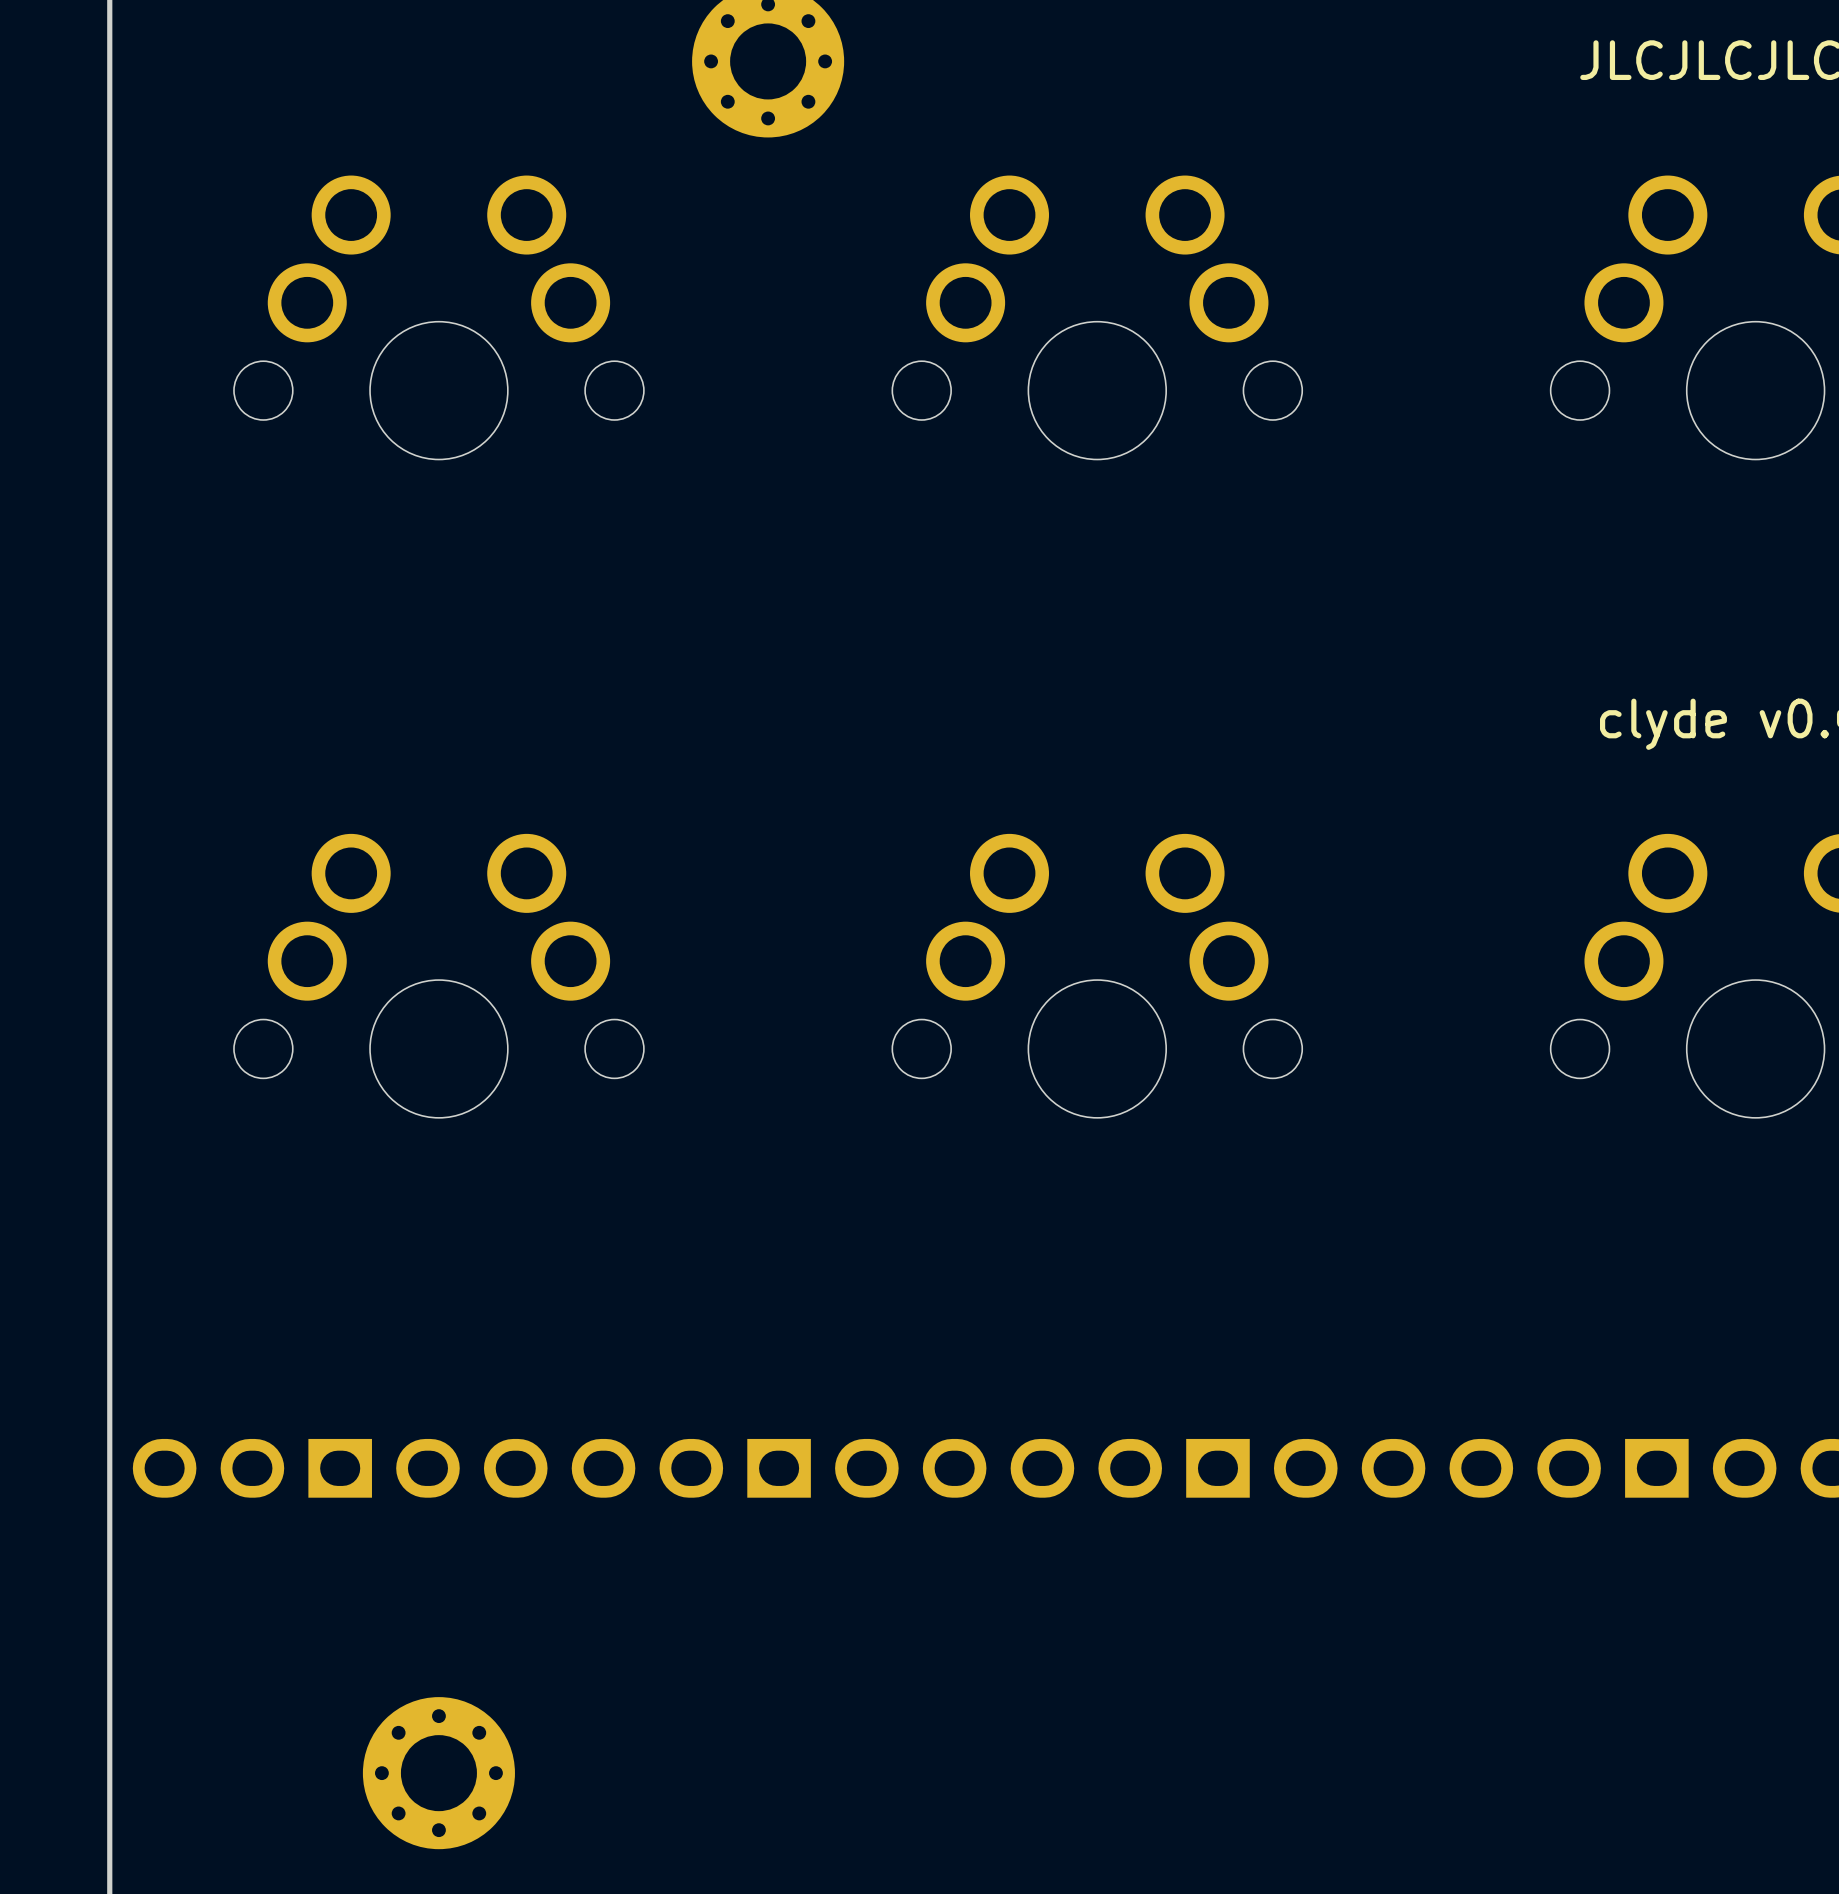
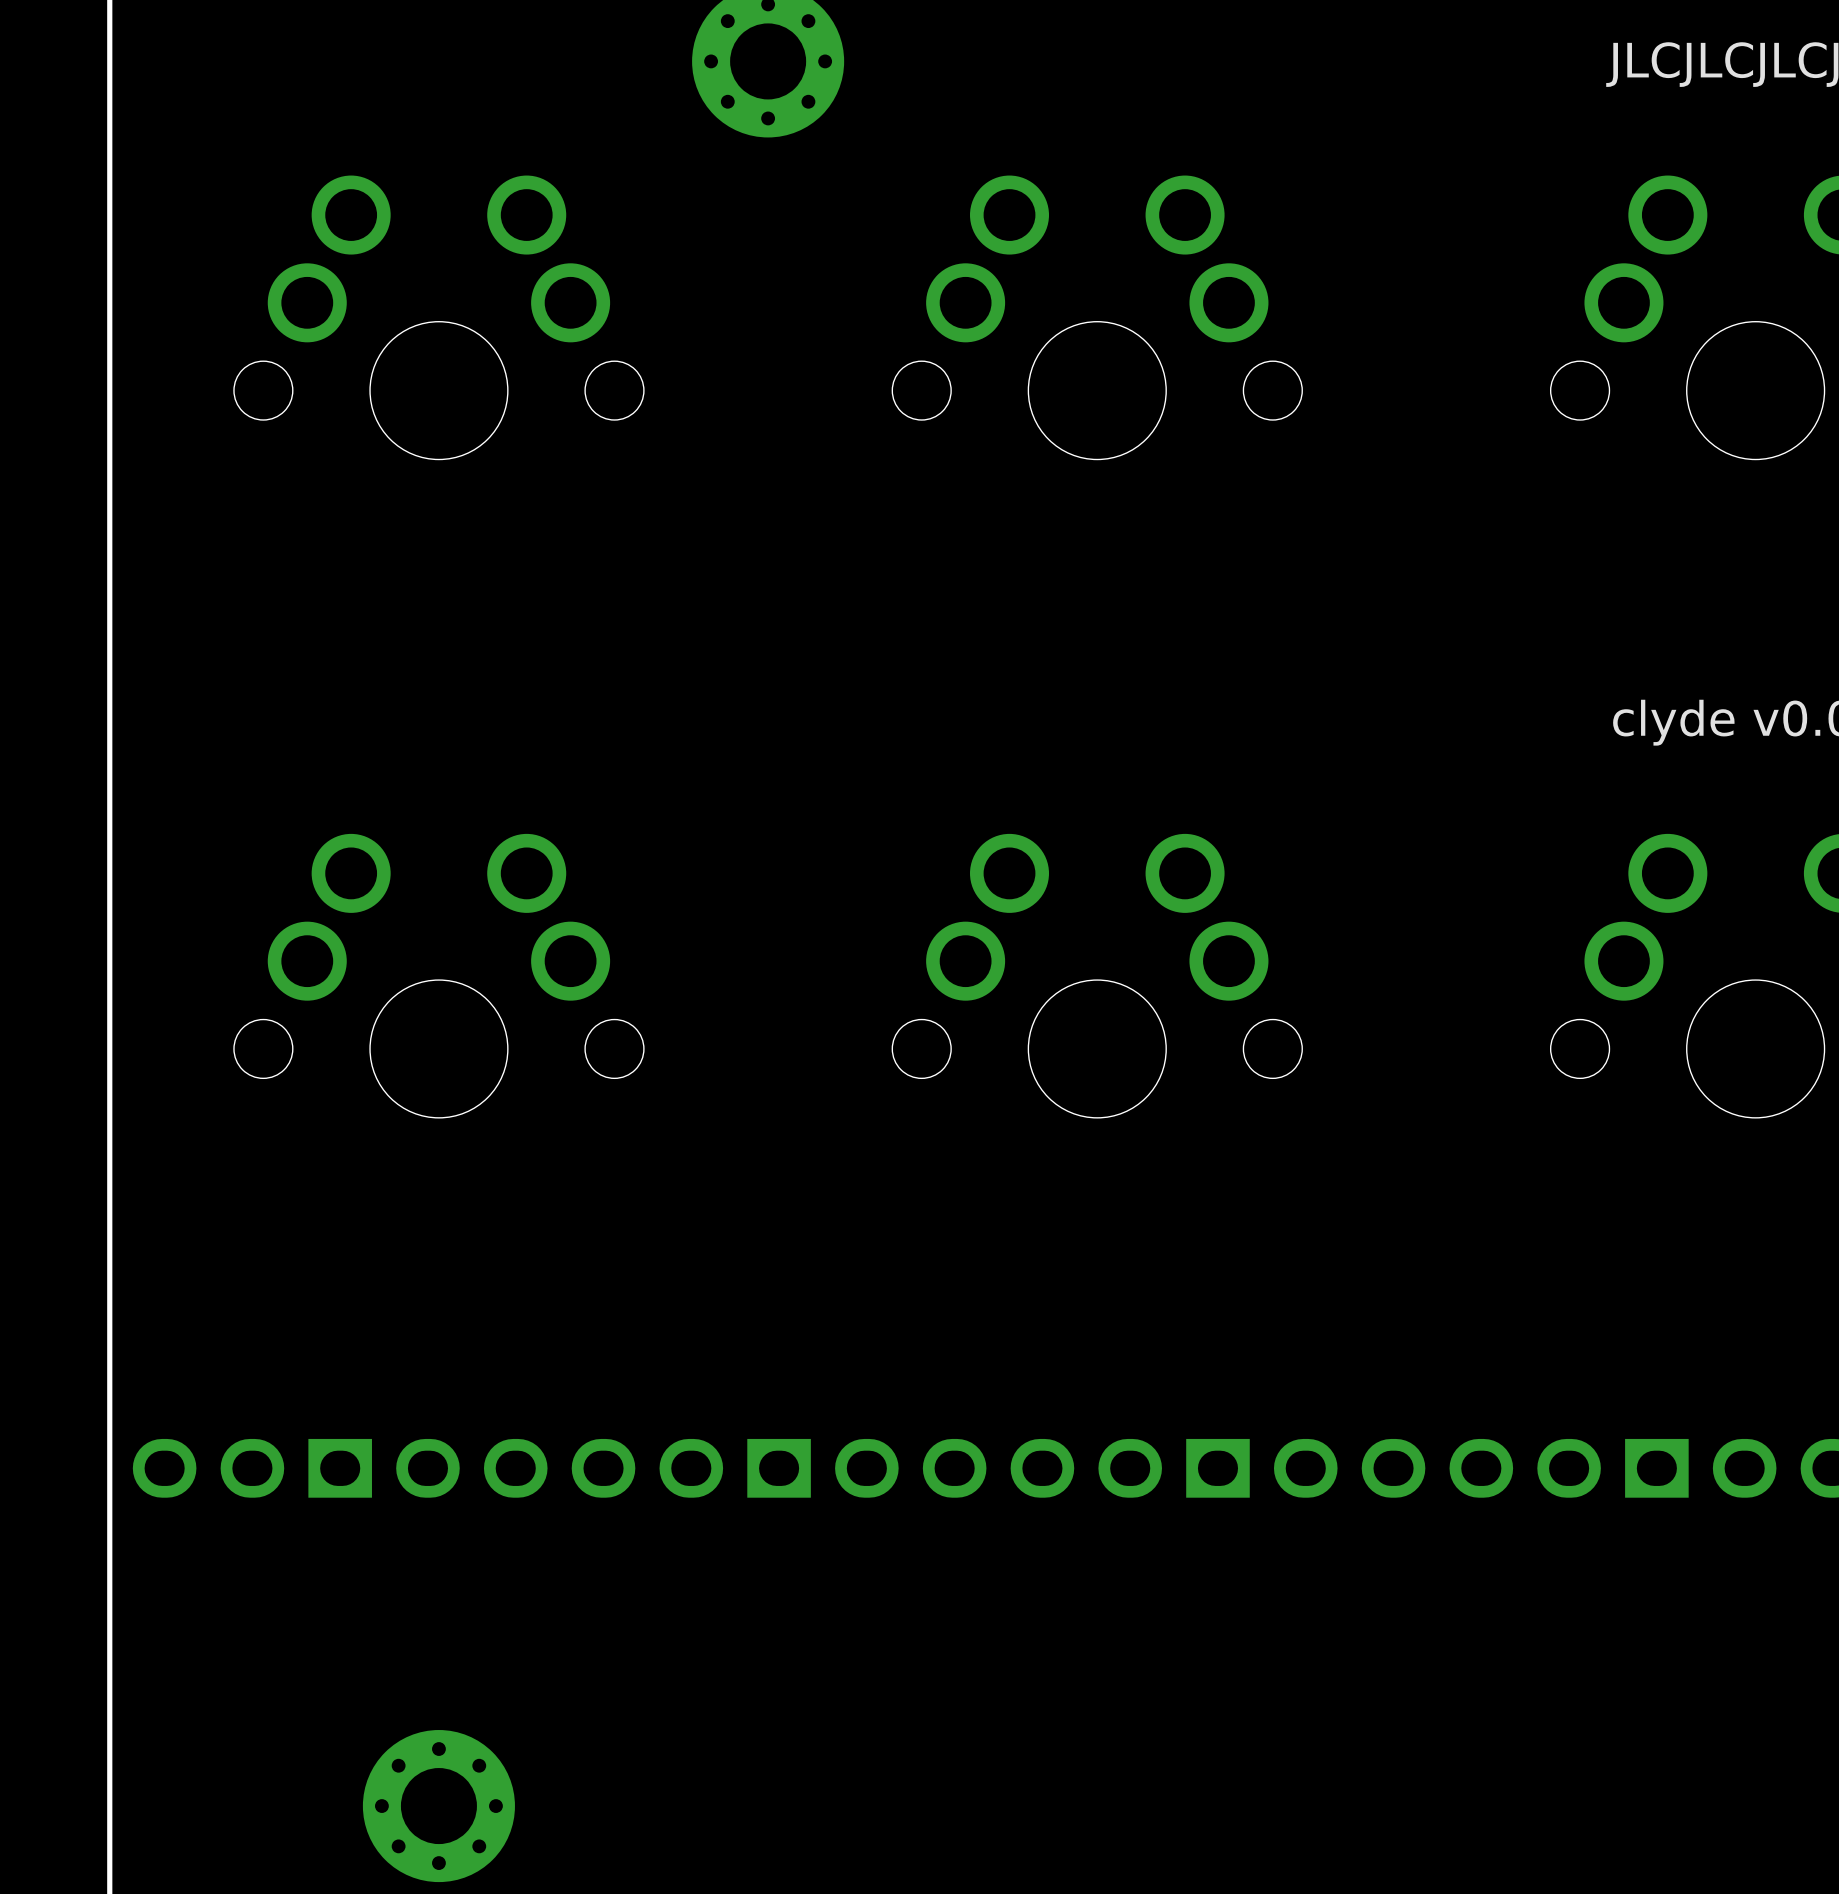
part position: (438, 1773) -> (438, 1806)

